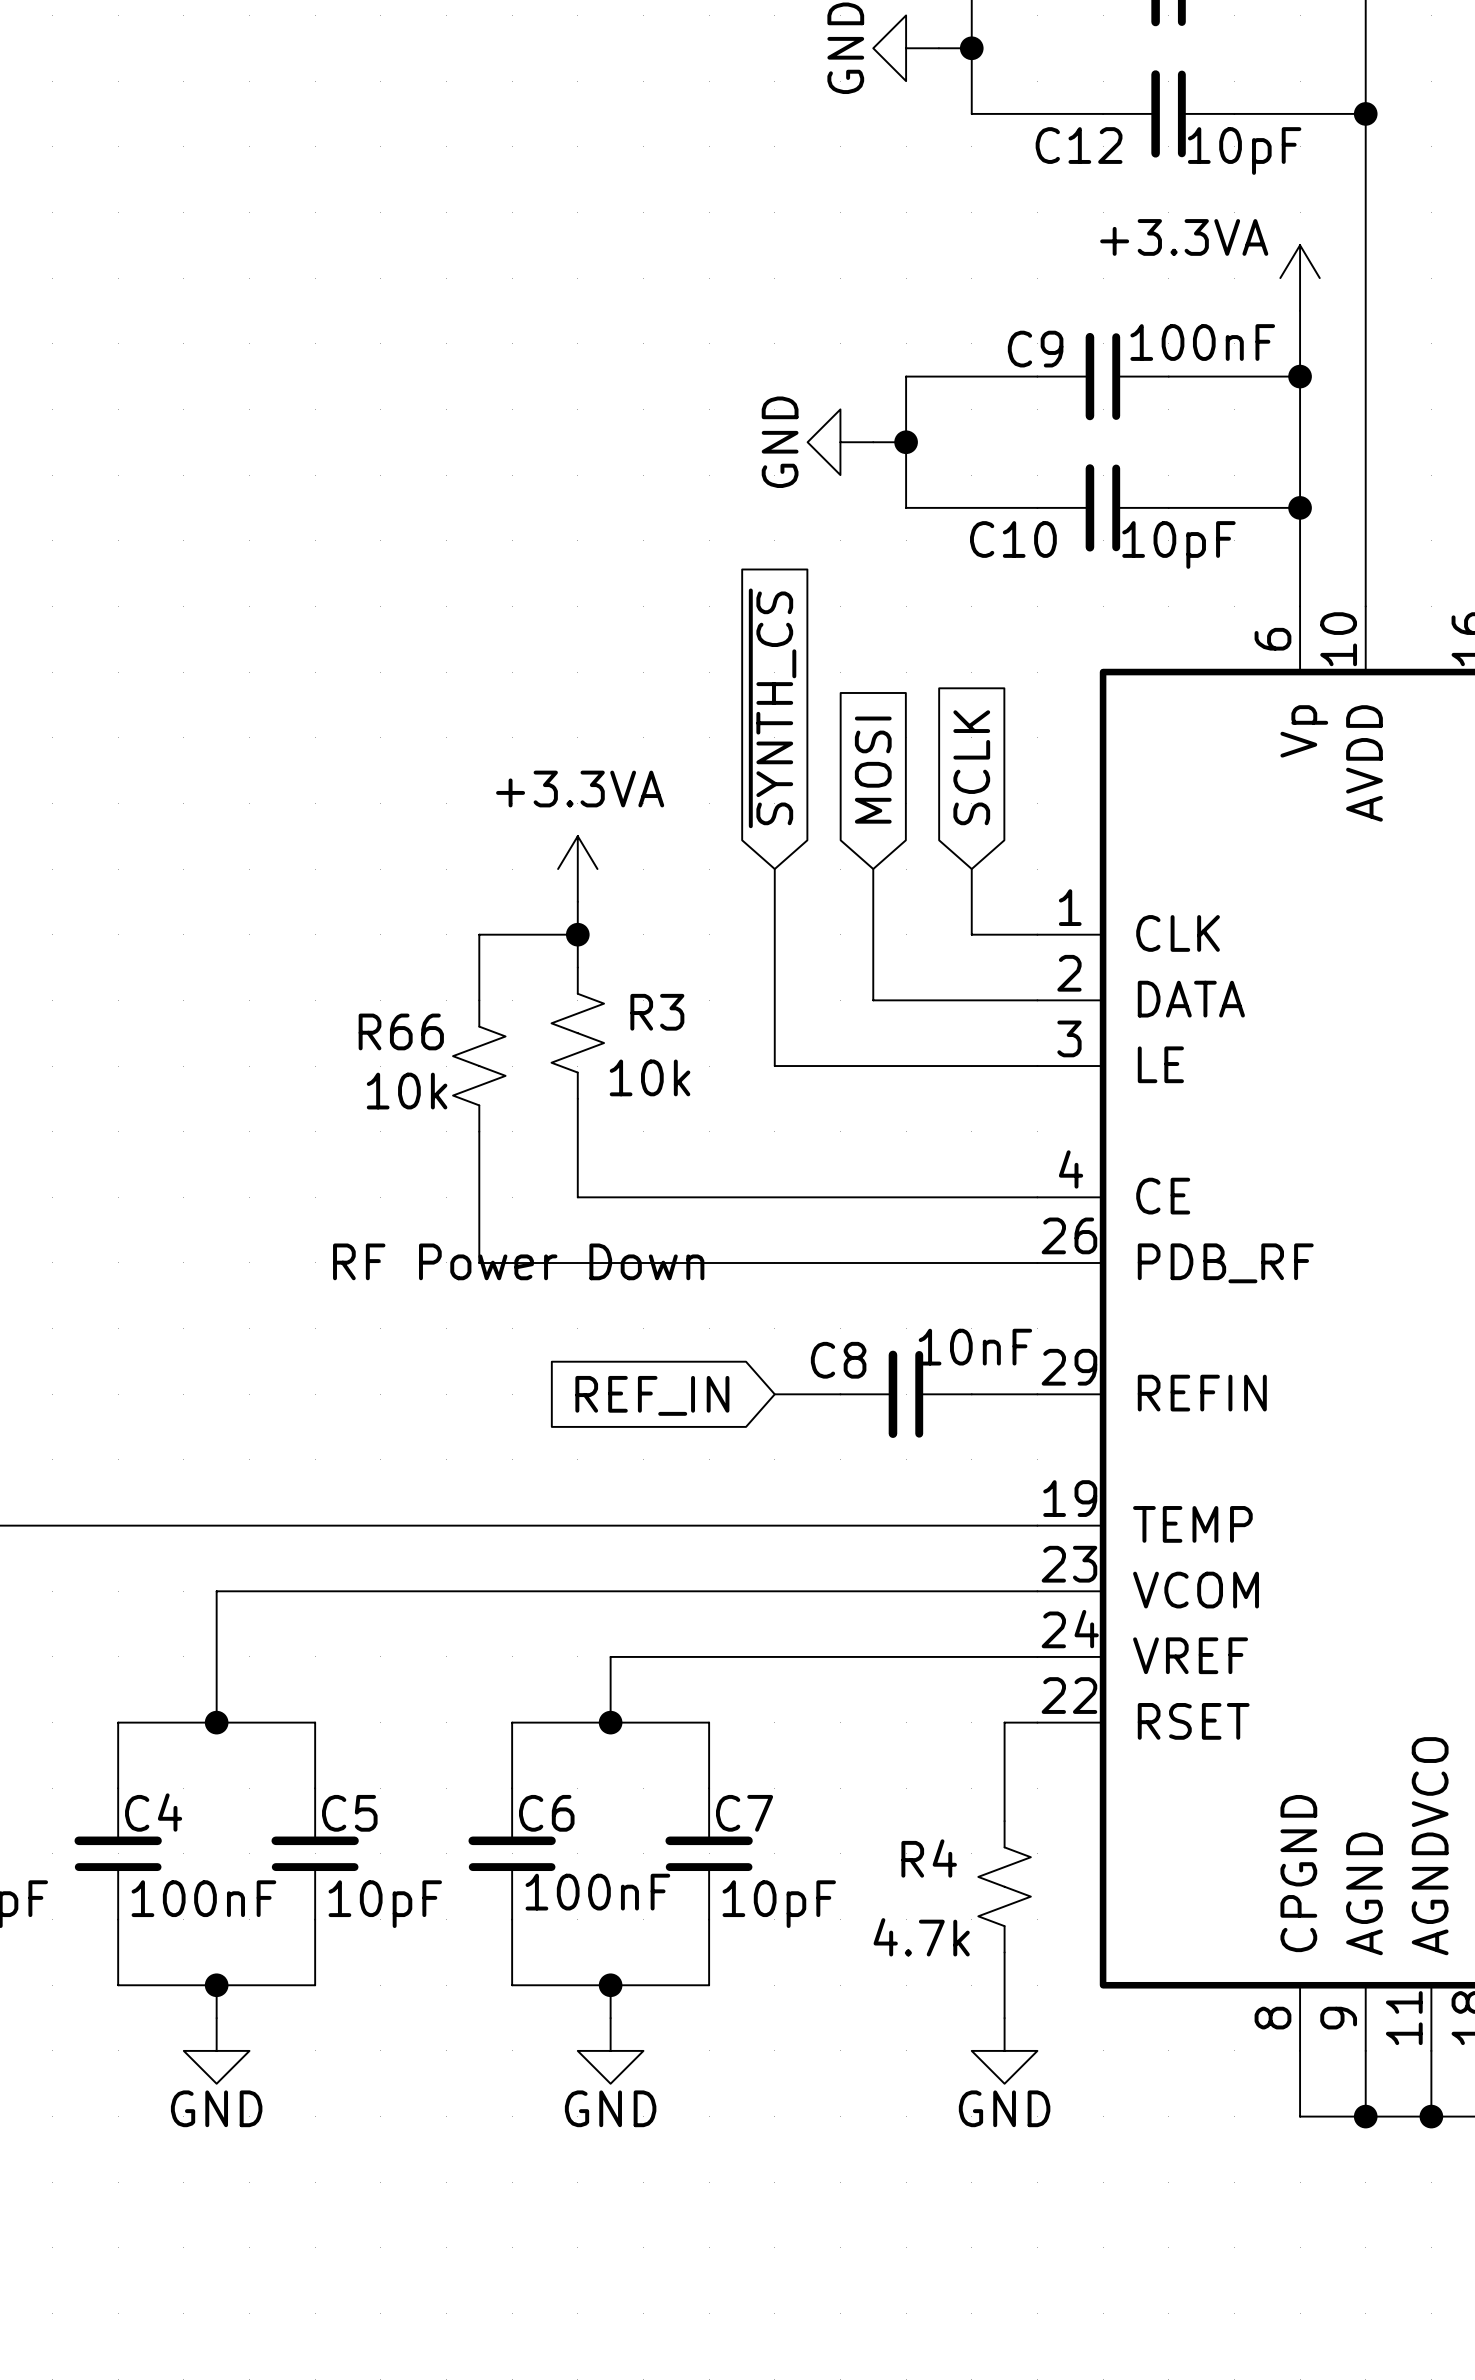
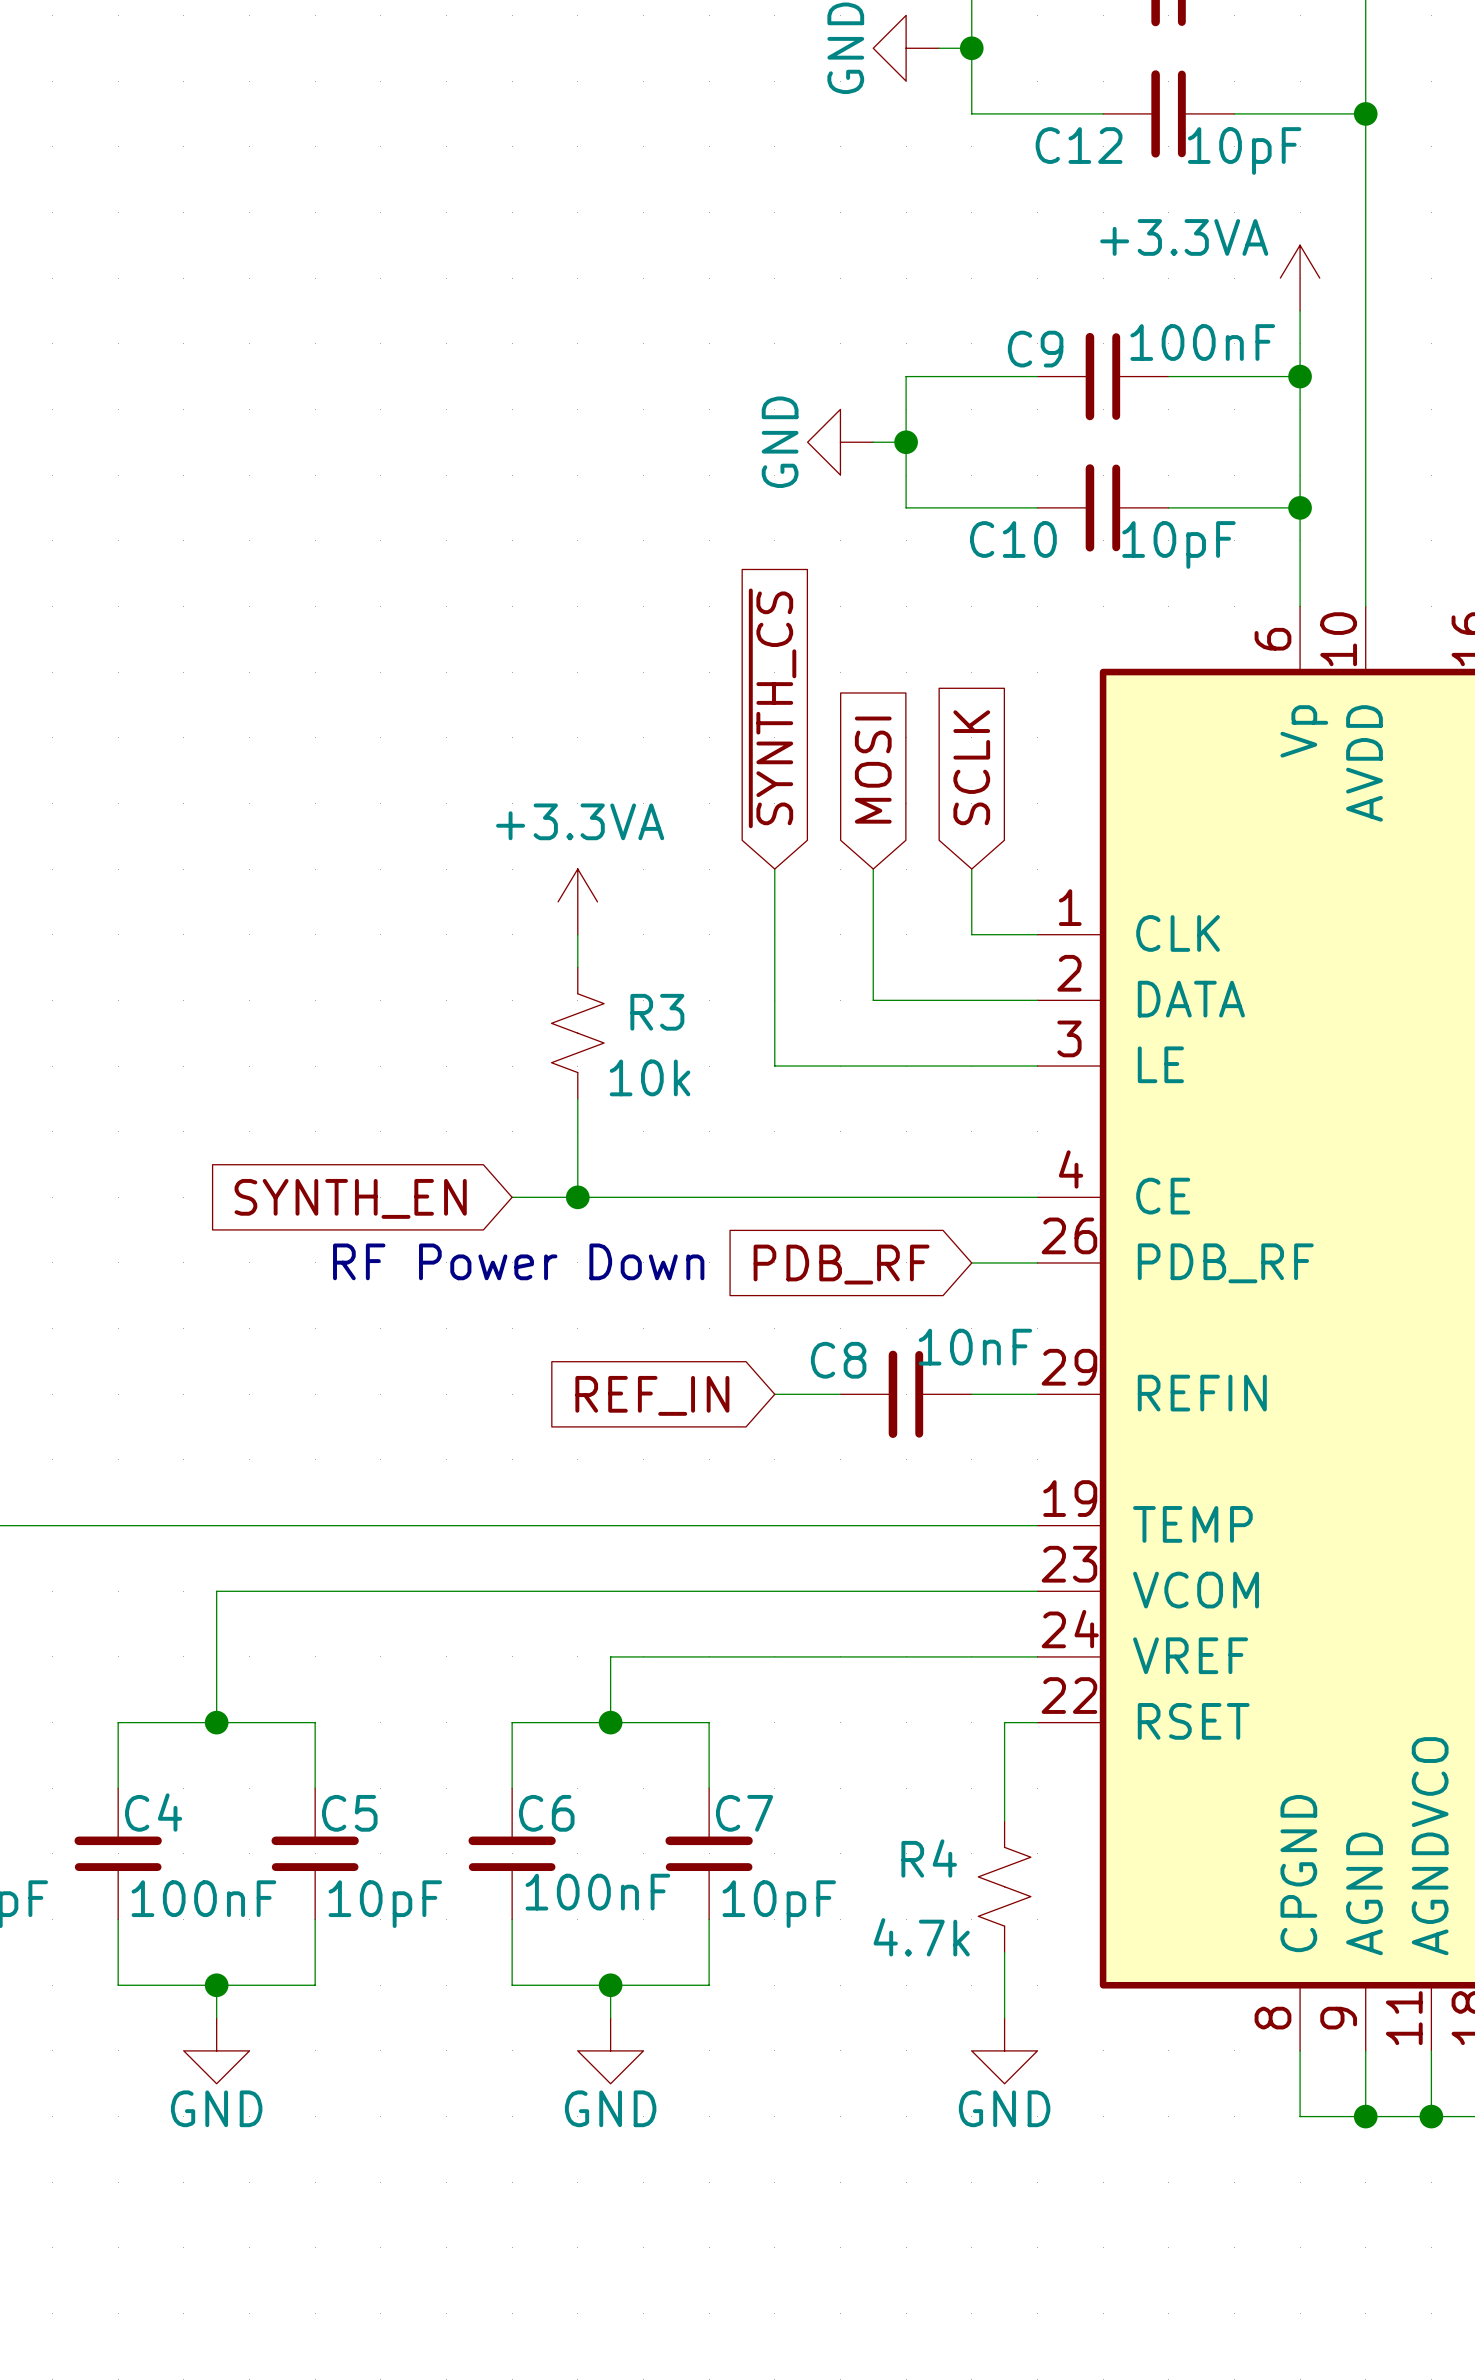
power symbol position: +3.3VA (577, 869) -> +3.3VA (577, 901)
wire: (577, 901) (577, 934) (479, 934) (479, 1000) -> none
junction: (577, 934) -> none
R66: 10k (479, 1066) -> none
wire: (479, 1131) (479, 1262) (971, 1262) -> none
wire: none -> (512, 1197) (577, 1197)
junction: none -> (577, 1197)
global label: none -> SYNTH_EN (350, 1198)
global label: none -> PDB_RF (841, 1264)

